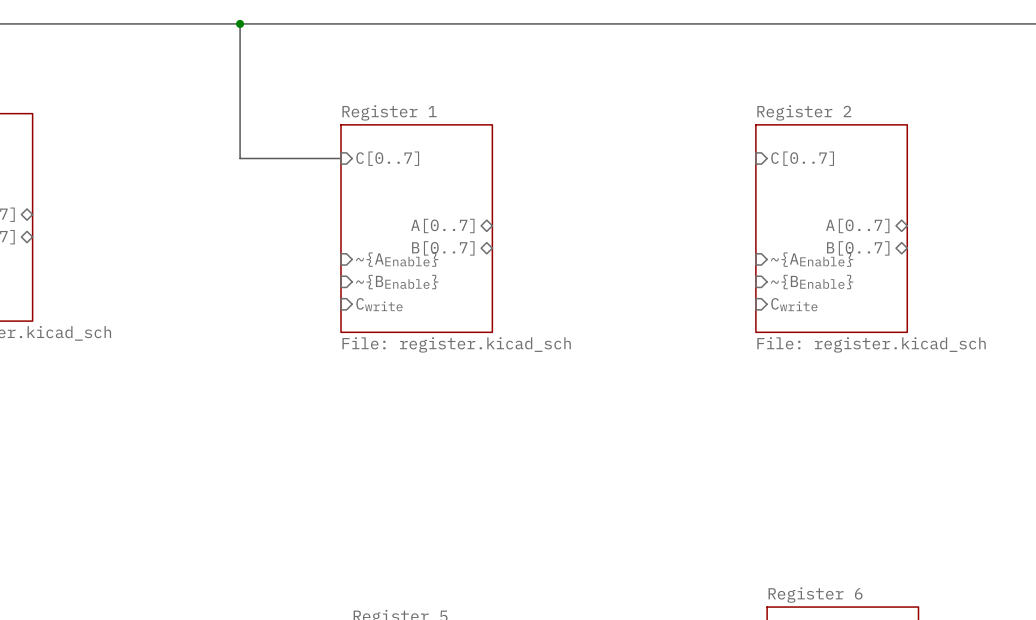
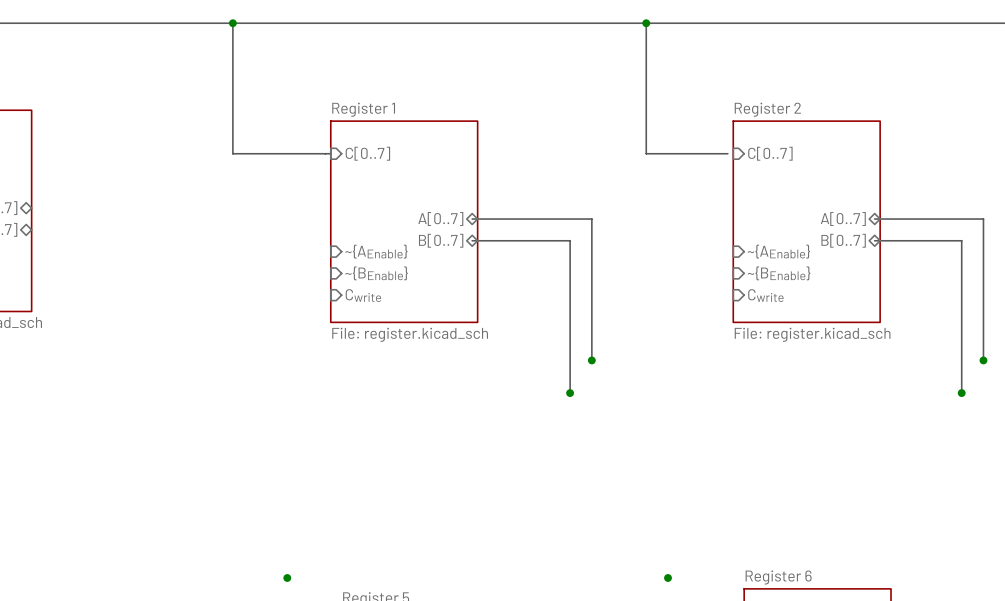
bus: none -> (646, 23) (646, 153) (727, 153)
junction: none -> (646, 23)
bus: none -> (472, 219) (591, 219) (591, 360)
bus: none -> (874, 219) (983, 219) (983, 360)
bus: none -> (472, 240) (570, 240) (570, 393)
bus: none -> (874, 240) (961, 240) (961, 393)
junction: none -> (591, 360)
junction: none -> (983, 360)
junction: none -> (570, 393)
junction: none -> (961, 393)
junction: none -> (287, 578)
junction: none -> (668, 578)

